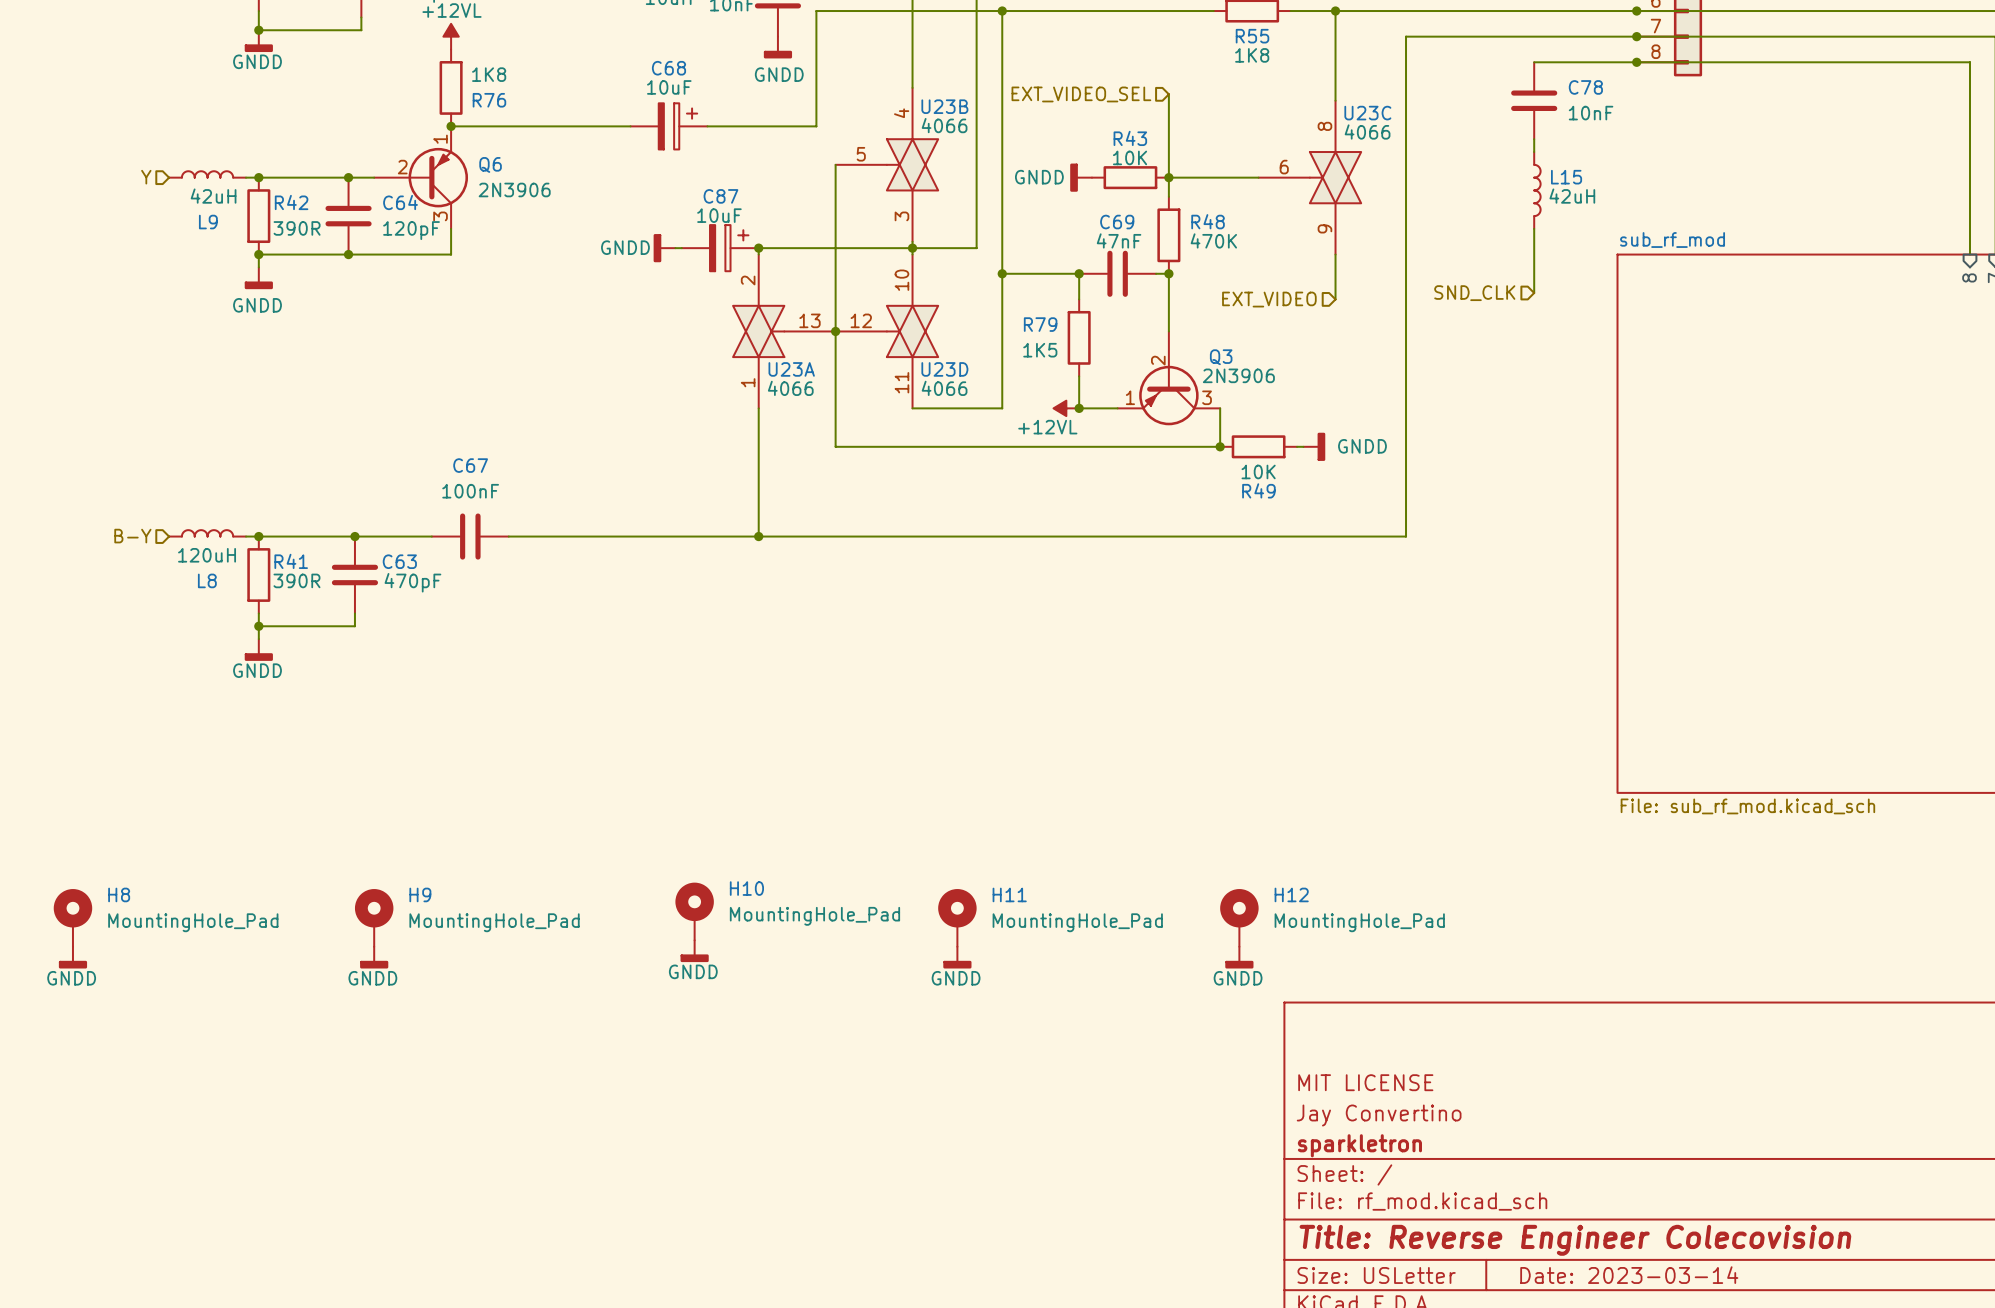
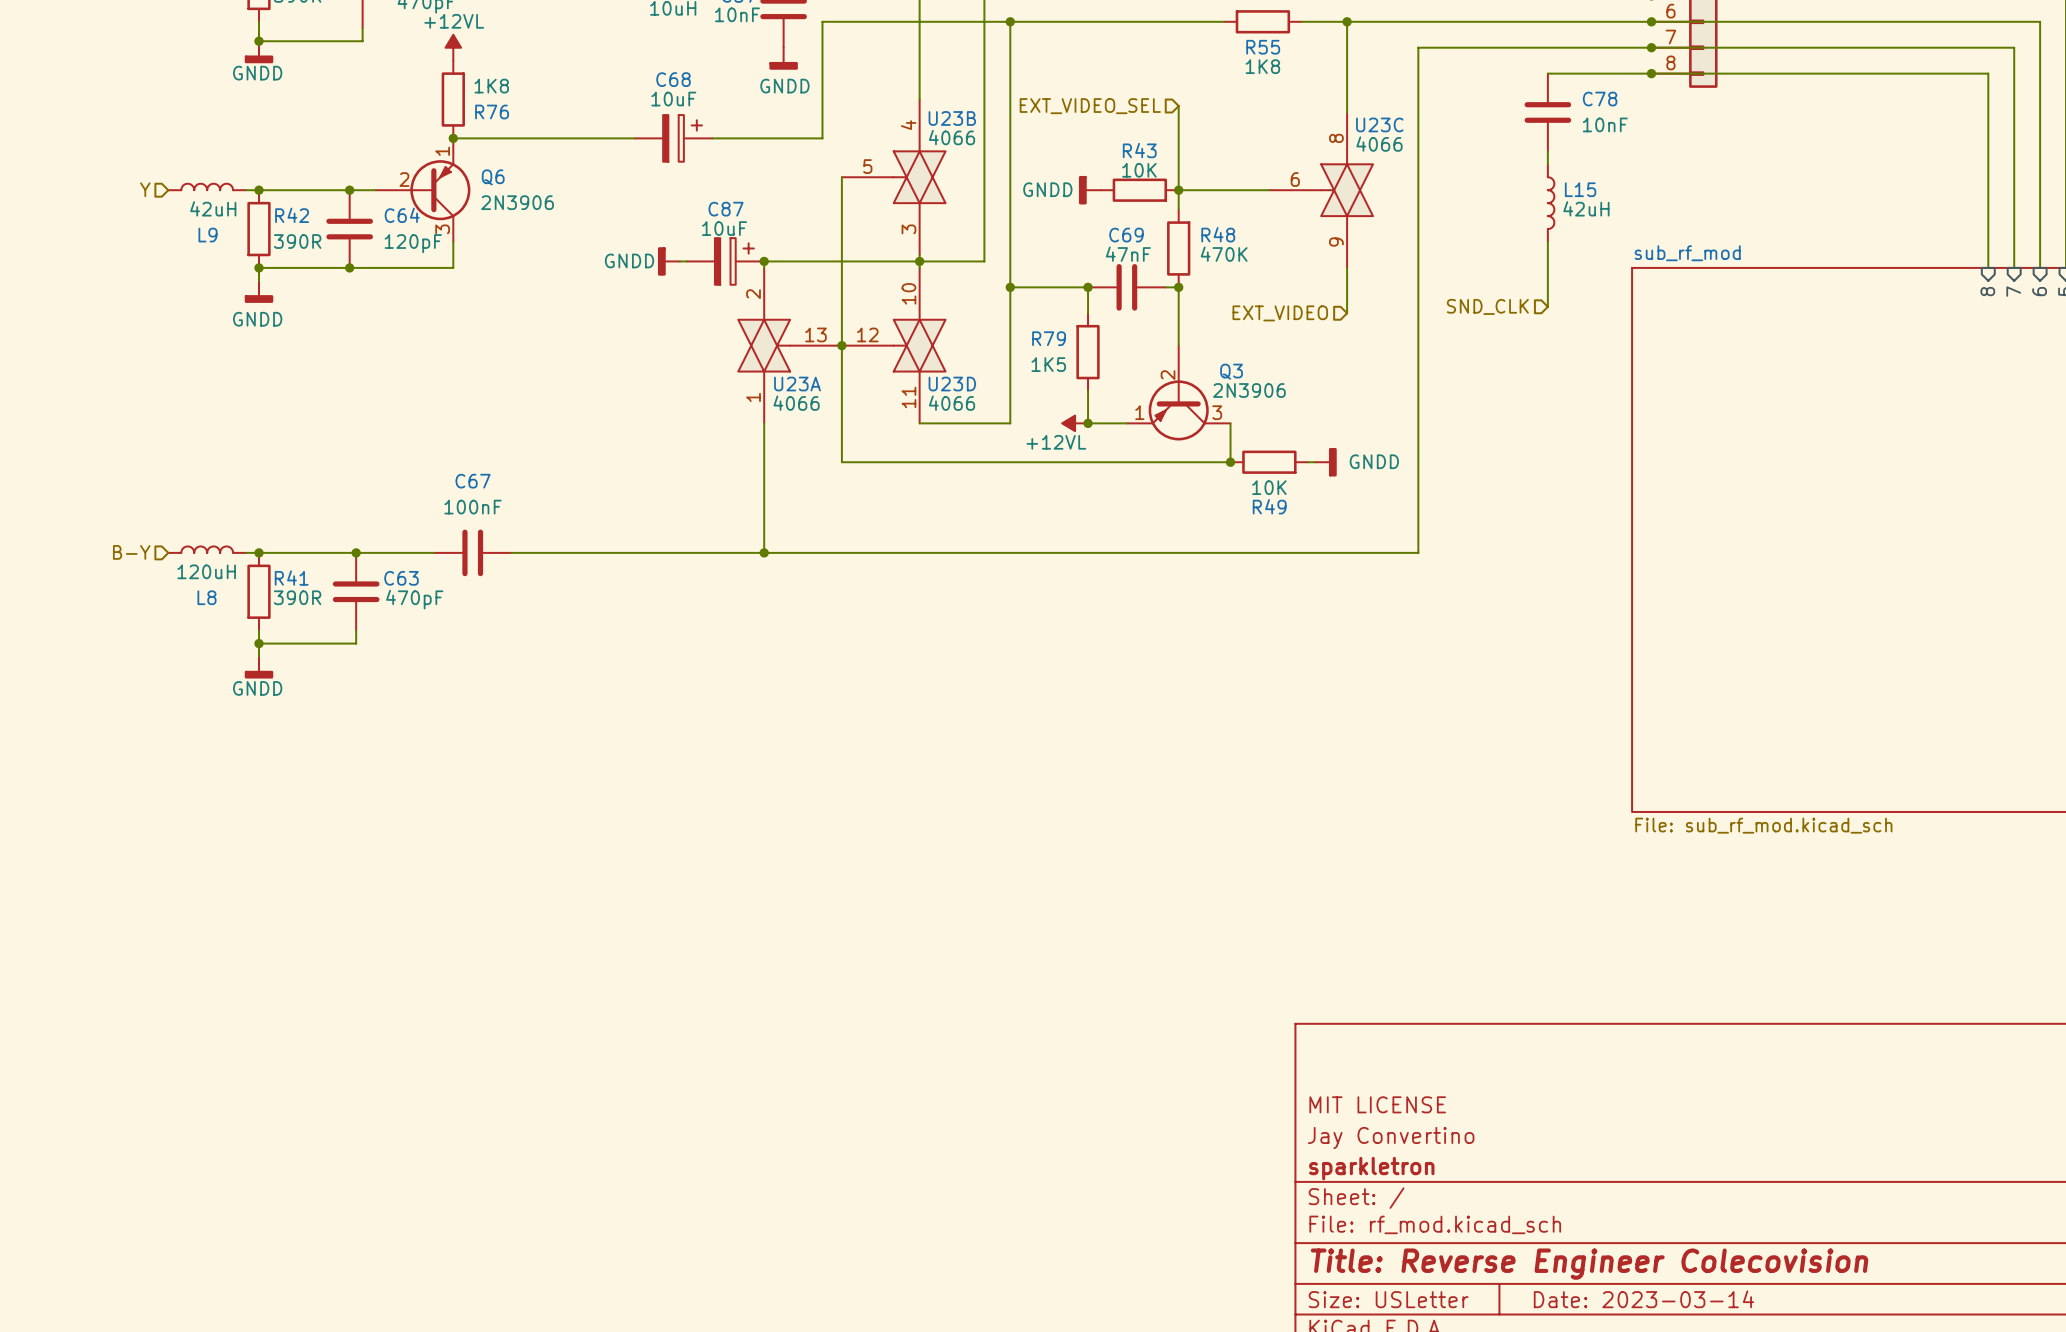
H10: MountingHole_Pad (694, 911) -> none
H8: MountingHole_Pad (72, 917) -> none
H9: MountingHole_Pad (374, 917) -> none
H11: MountingHole_Pad (957, 917) -> none
H12: MountingHole_Pad (1239, 917) -> none
power symbol: GNDD (694, 951) -> none
power symbol: GNDD (72, 957) -> none
power symbol: GNDD (374, 957) -> none
power symbol: GNDD (957, 957) -> none
power symbol: GNDD (1239, 957) -> none

